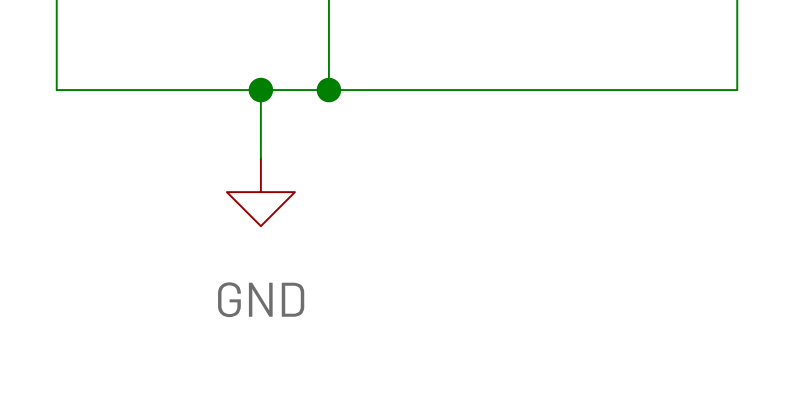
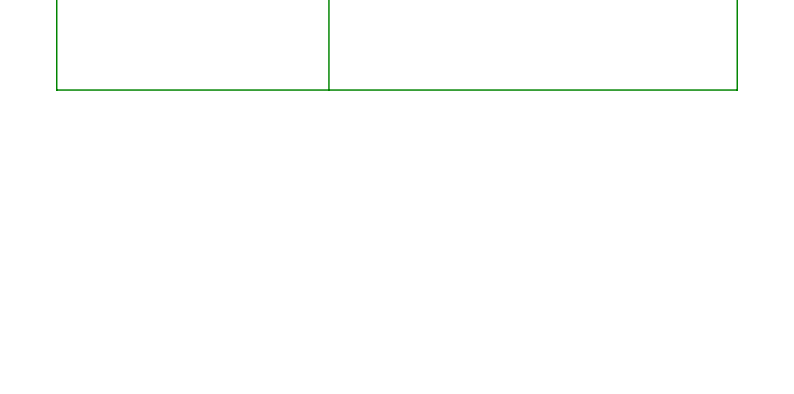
wire: (260, 90) (260, 158) -> none
junction: (260, 90) -> none
junction: (328, 90) -> none
power symbol: GND (260, 192) -> none

